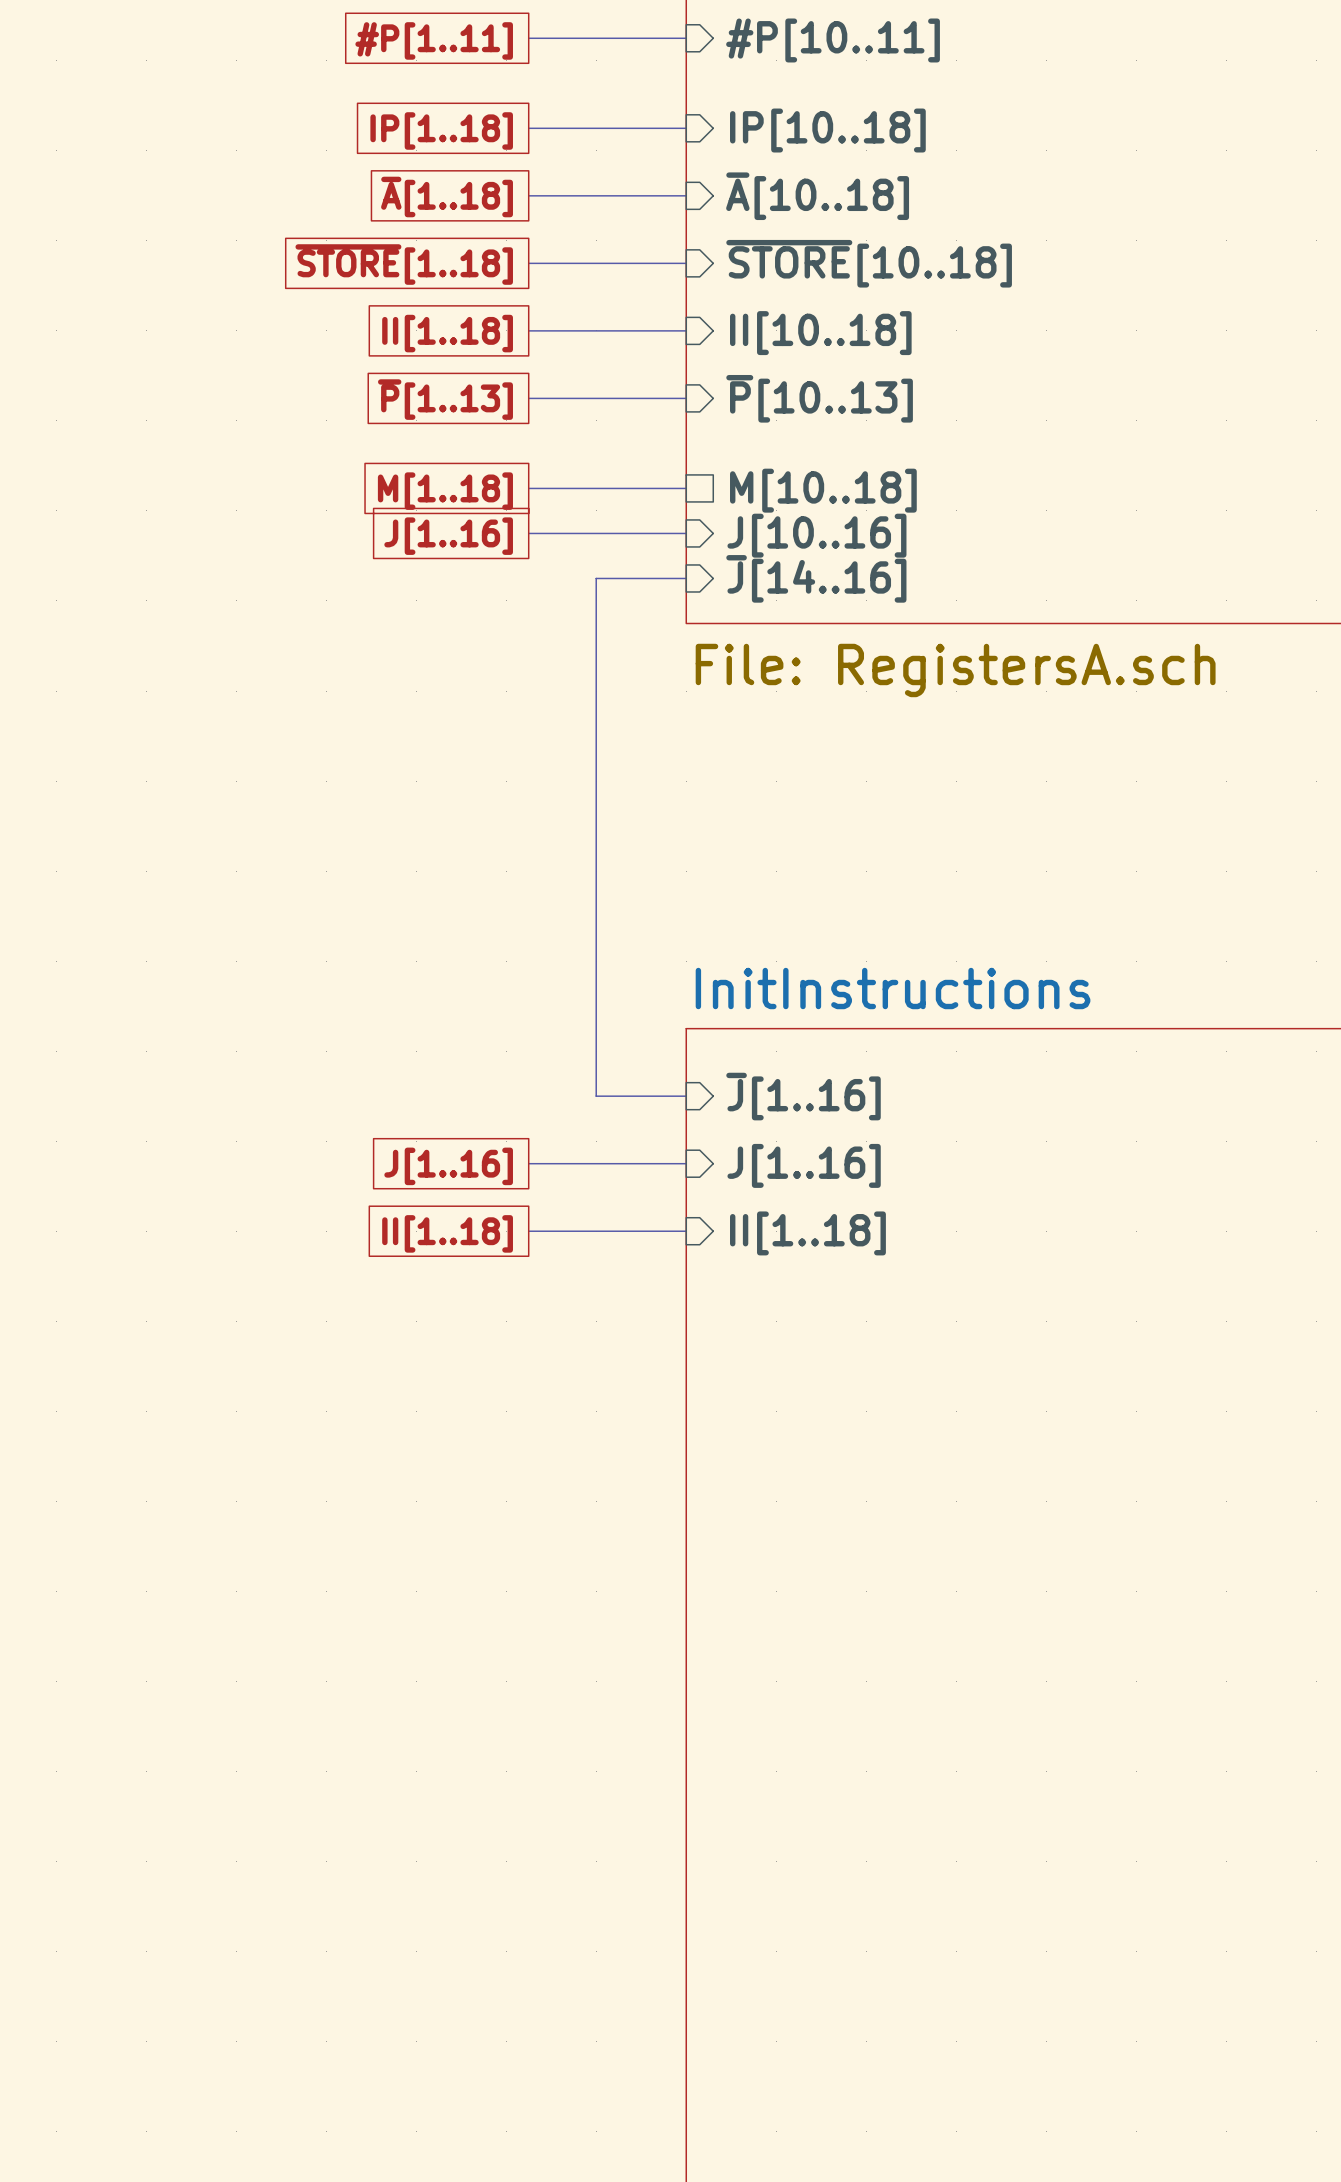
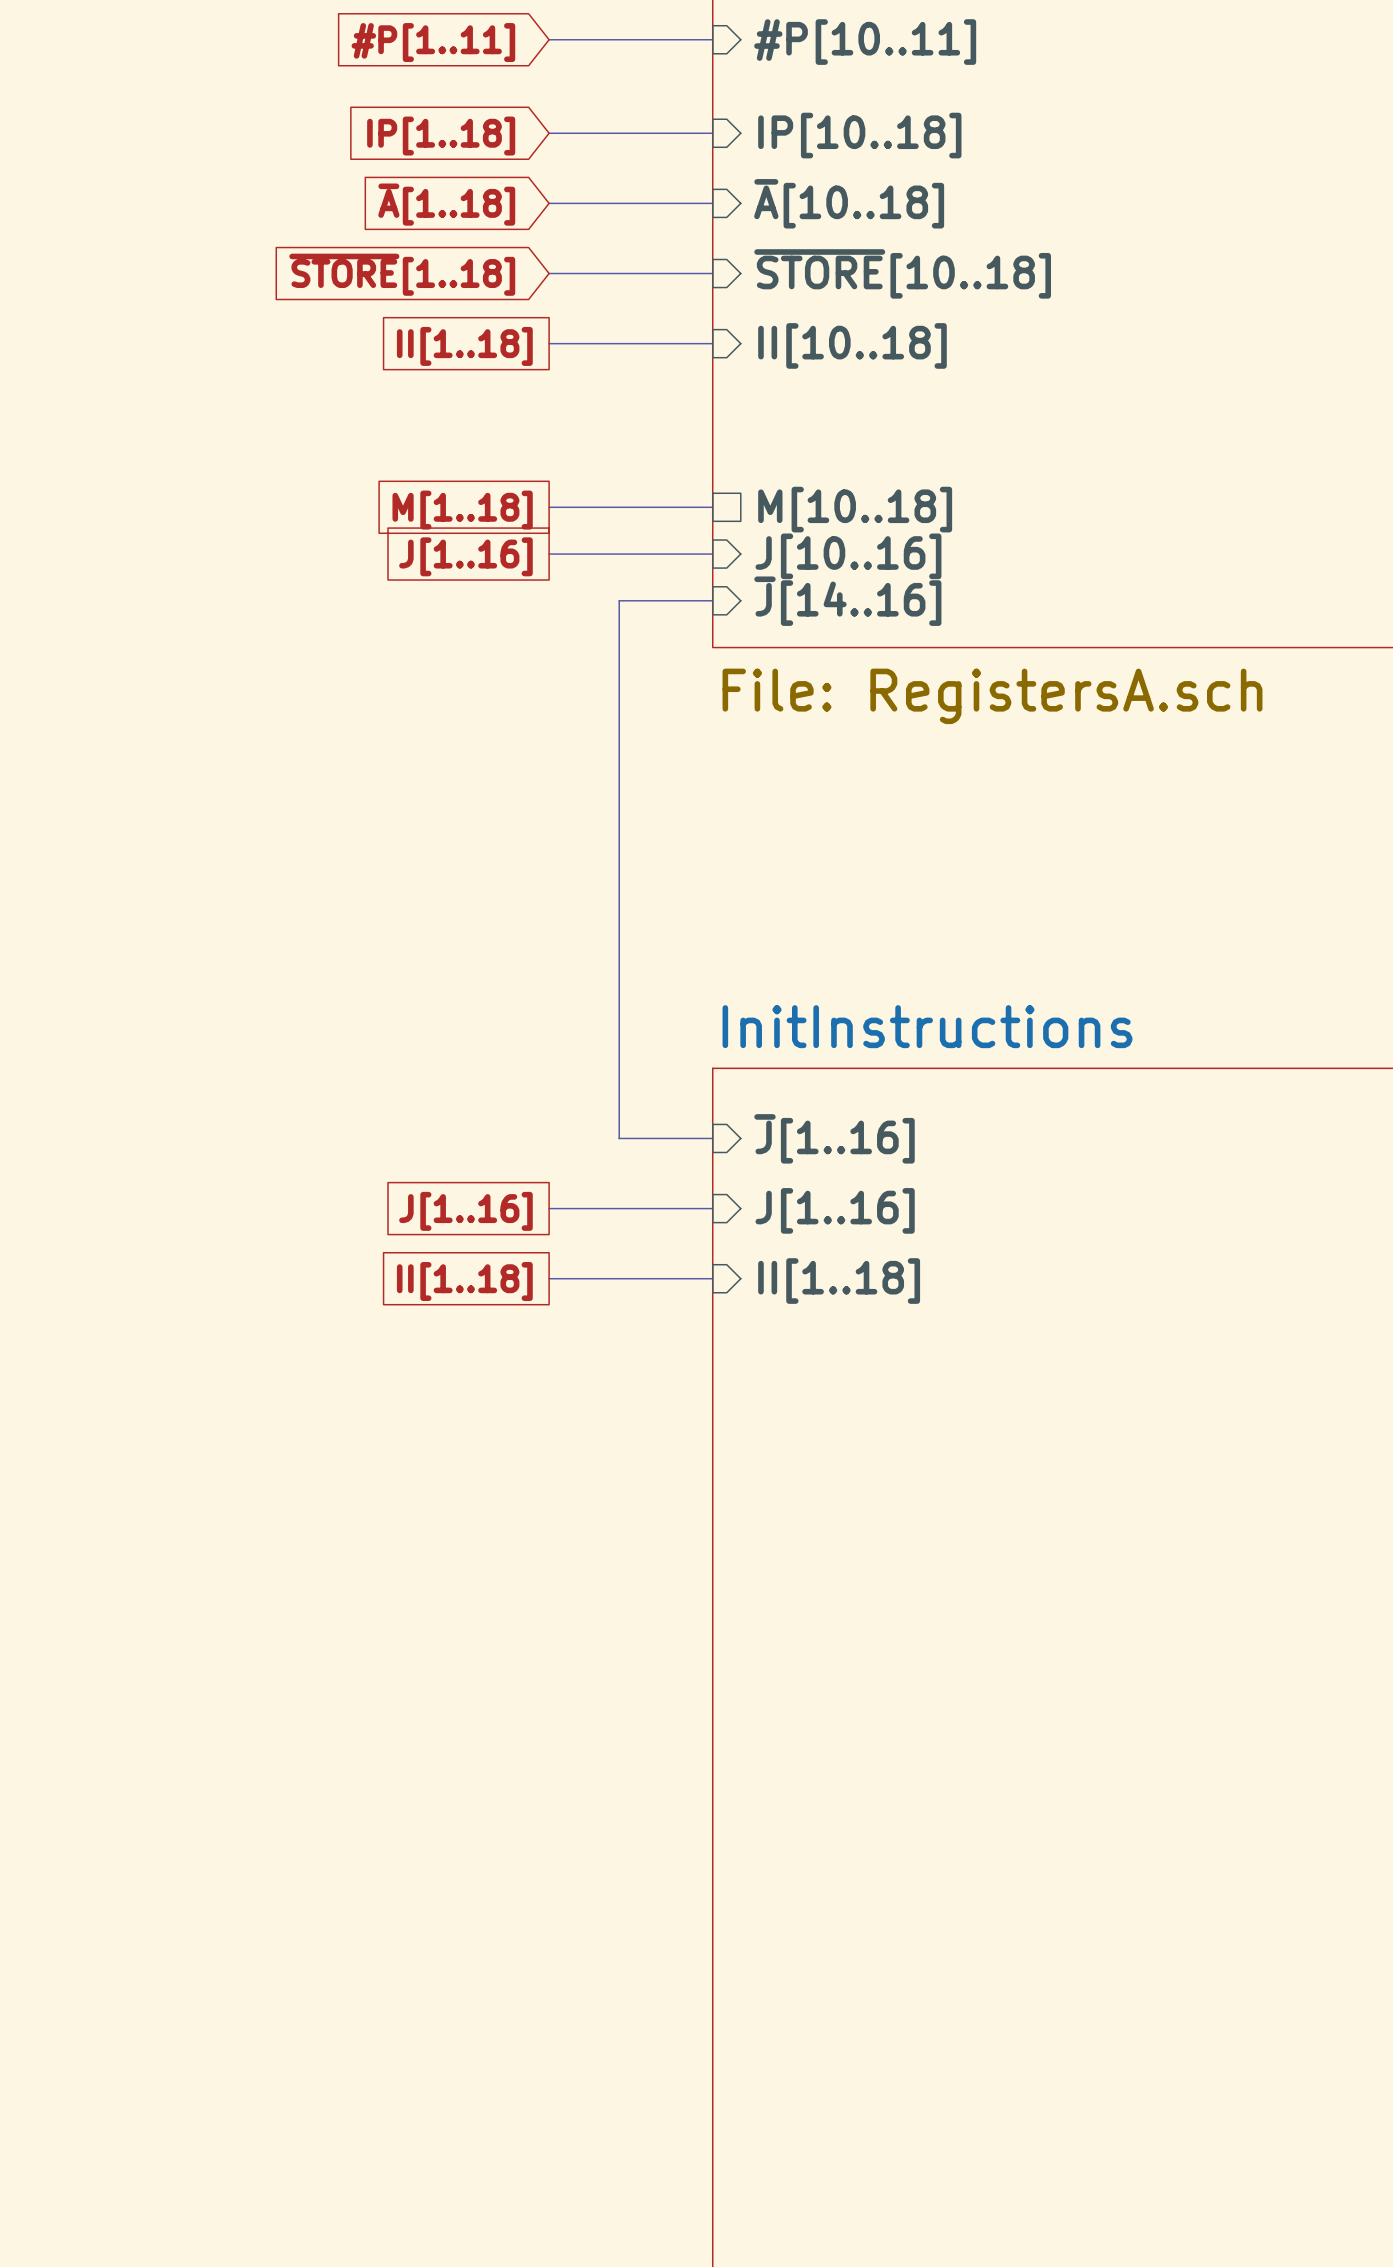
global label shape: passive (434, 40) -> input (433, 42)
global label shape: passive (441, 130) -> input (441, 136)
global label shape: passive (447, 197) -> input (446, 204)
global label shape: passive (404, 264) -> input (402, 274)
bus: (528, 398) (686, 398) -> none
sheet pin: ~{P}[10..13] (819, 398) -> none
global label: ~{P}[1..13] (445, 399) -> none

